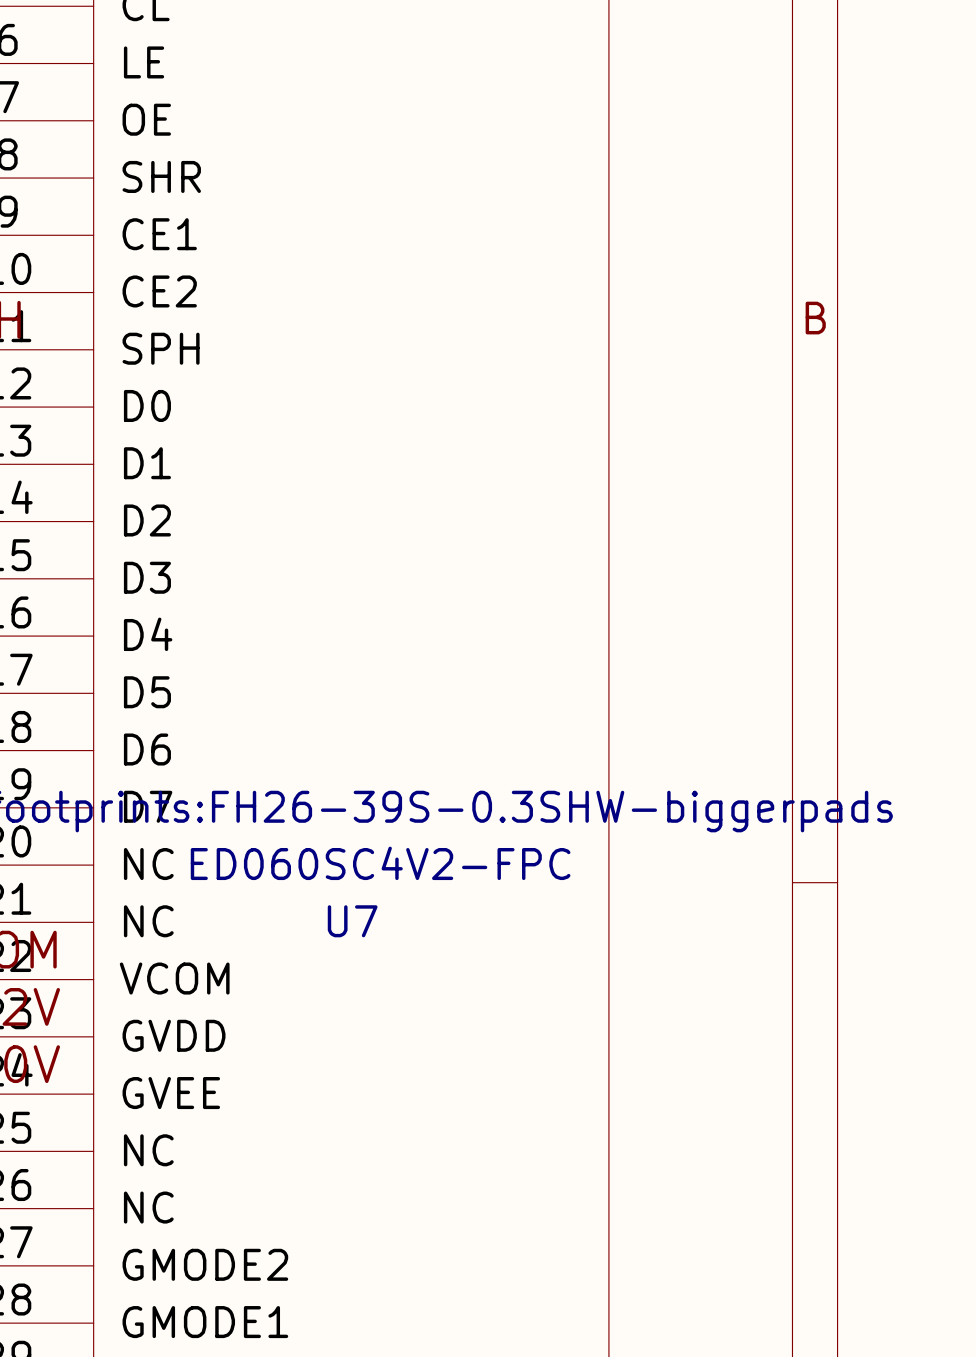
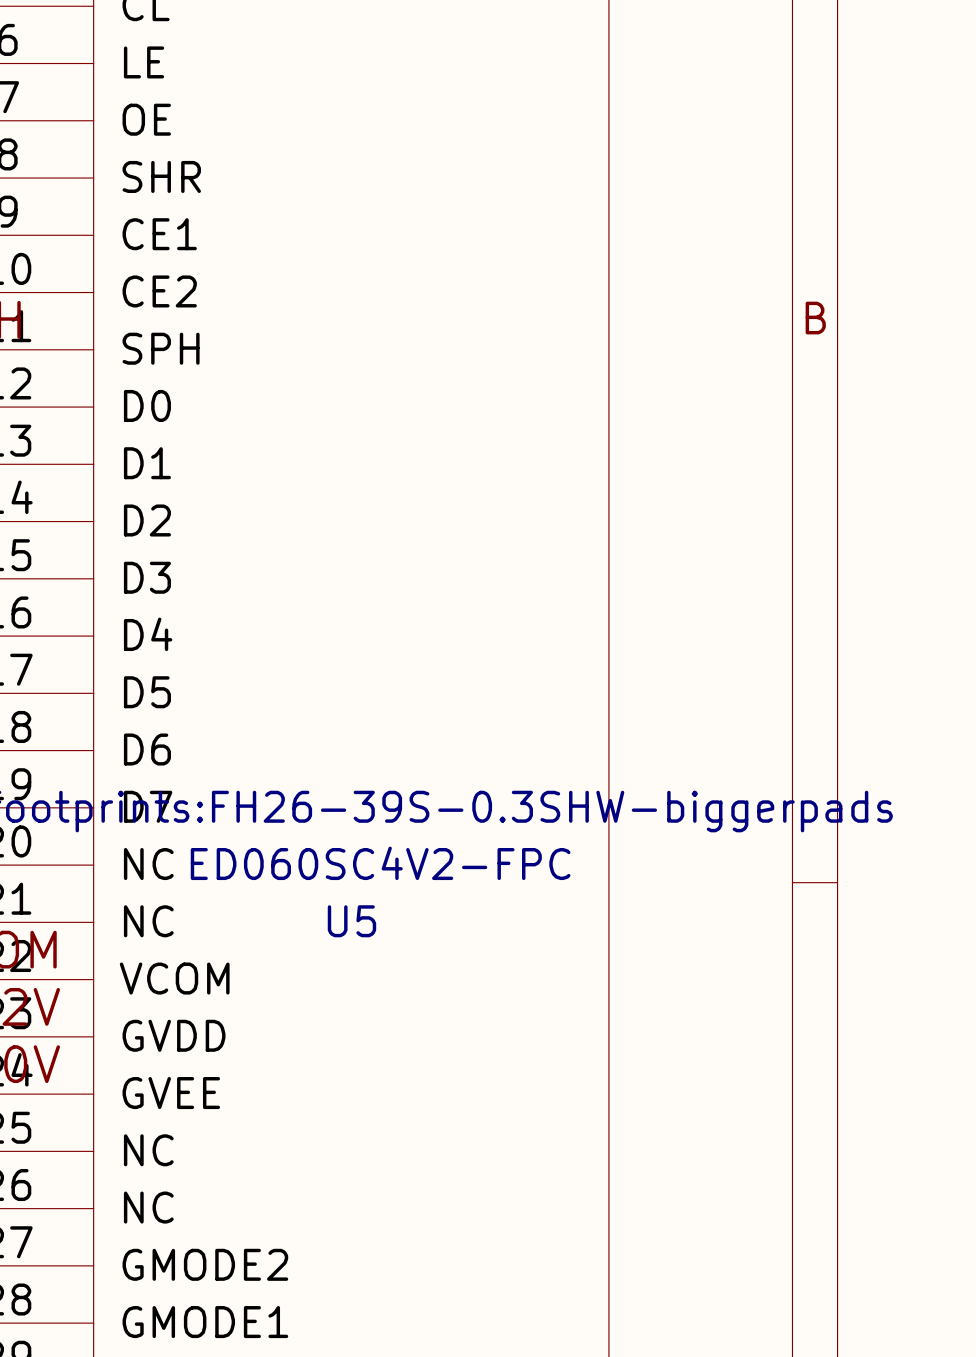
U7 name: U7 (352, 921) -> U5 (351, 921)

